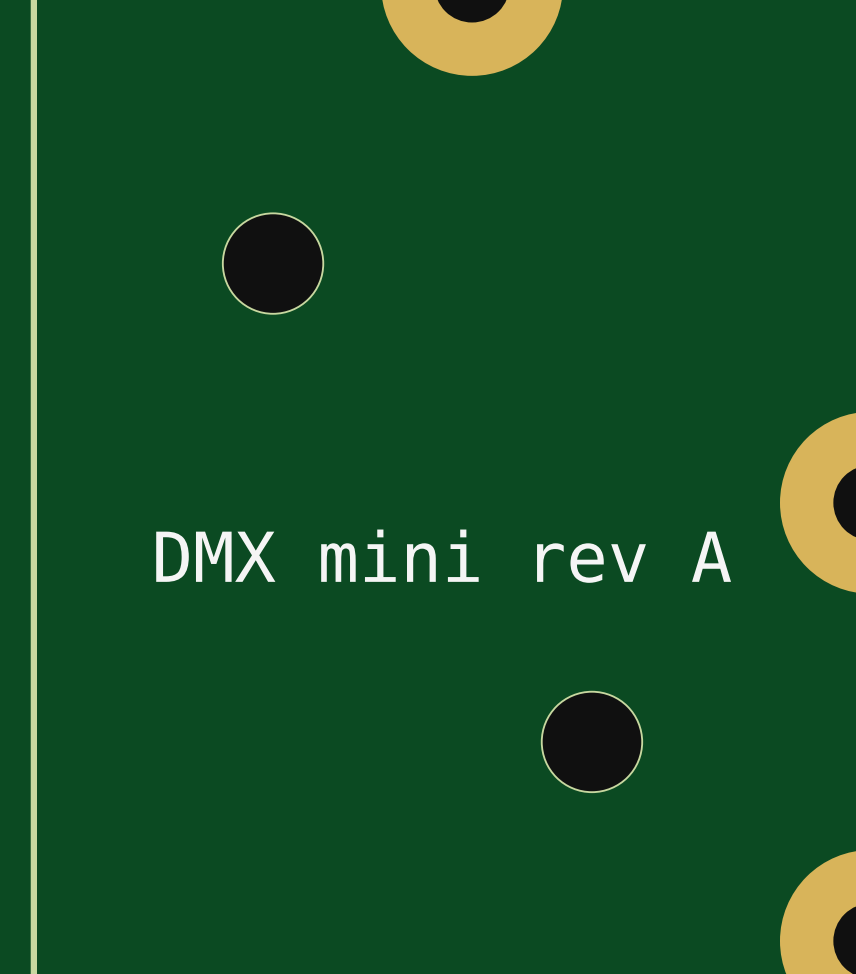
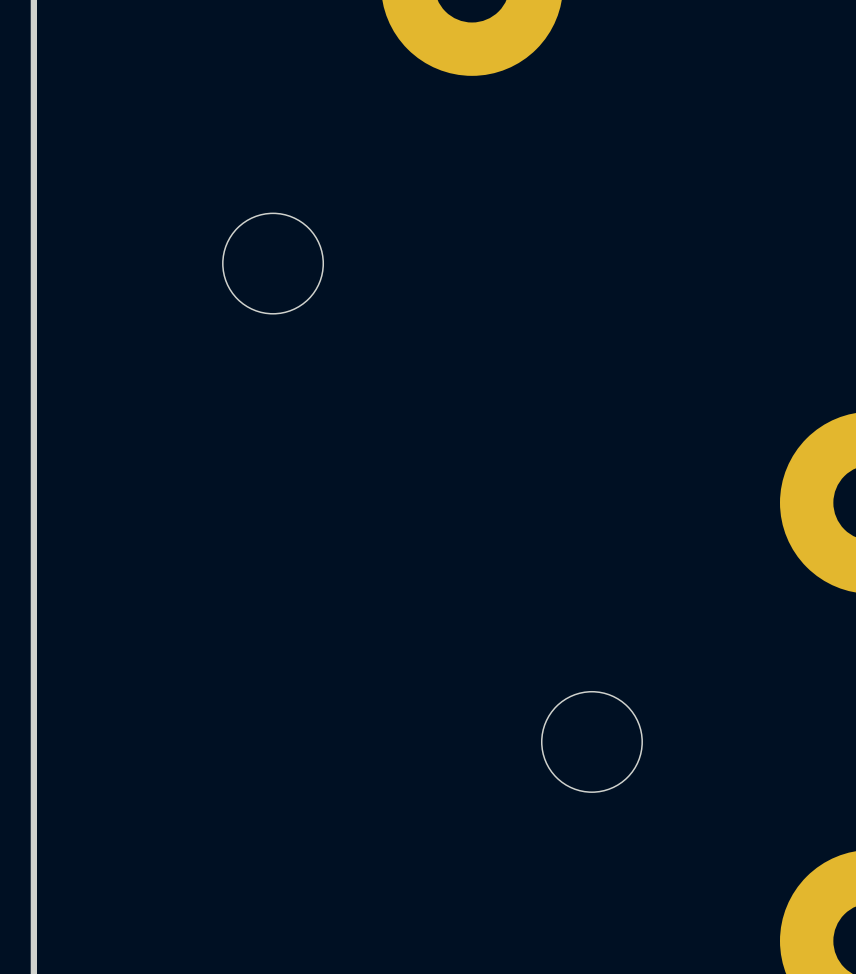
text: DMX mini rev A (443, 556) -> none

